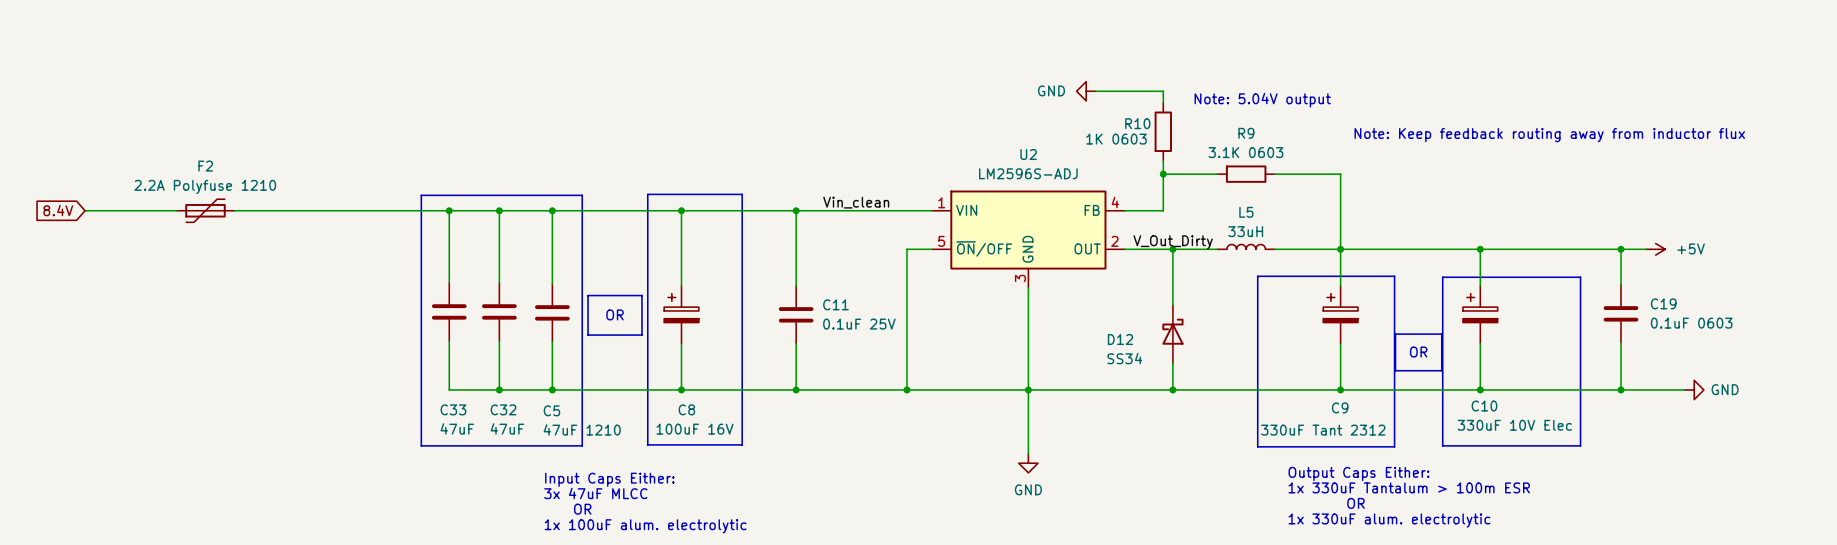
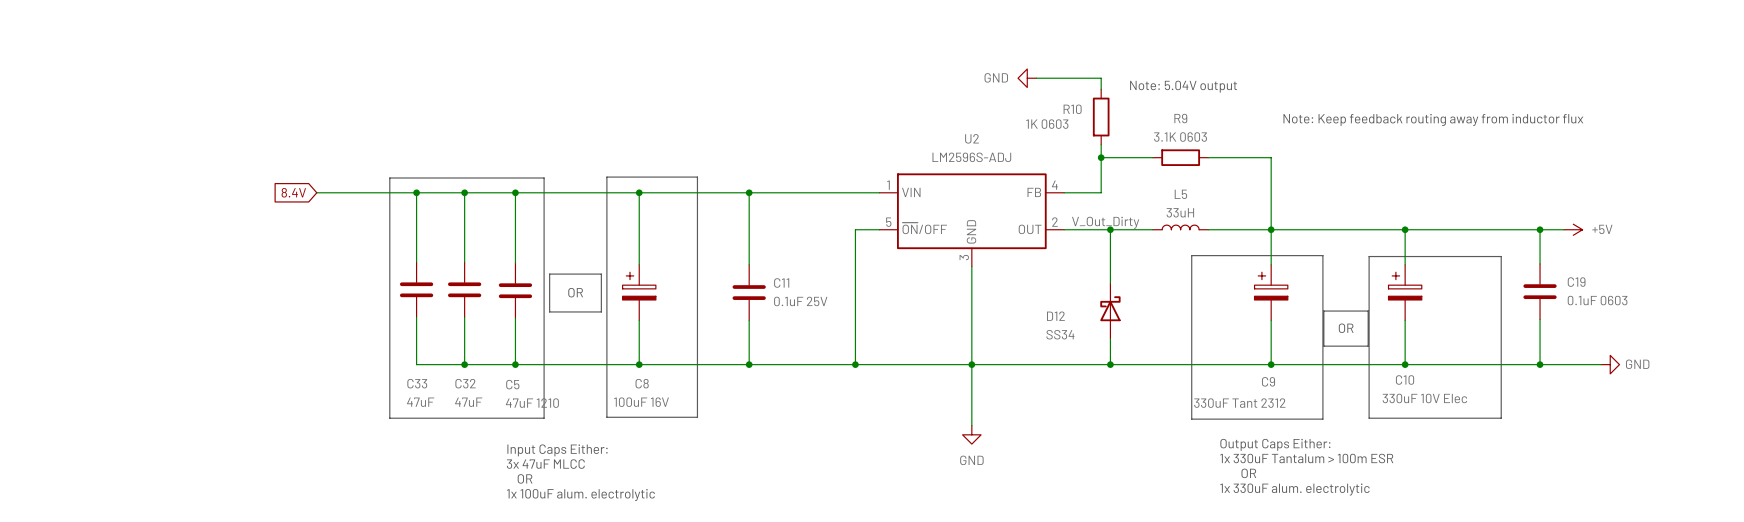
label: Vin_clean (856, 202) -> none
global label: 8.4V (58, 210) -> none
wire: (85, 210) (176, 210) -> none
F2: 2.2A Polyfuse 1210 (205, 210) -> none
wire: (234, 210) (345, 210) -> none
global label: none -> 8.4V (293, 192)

